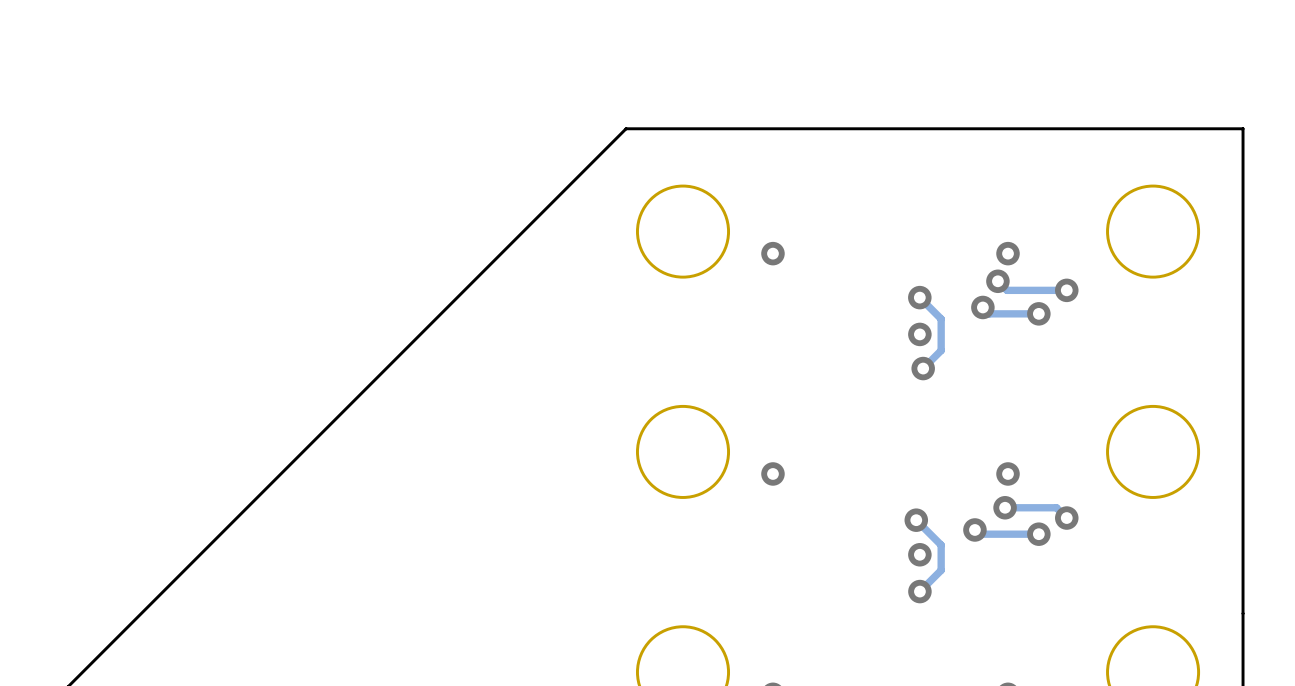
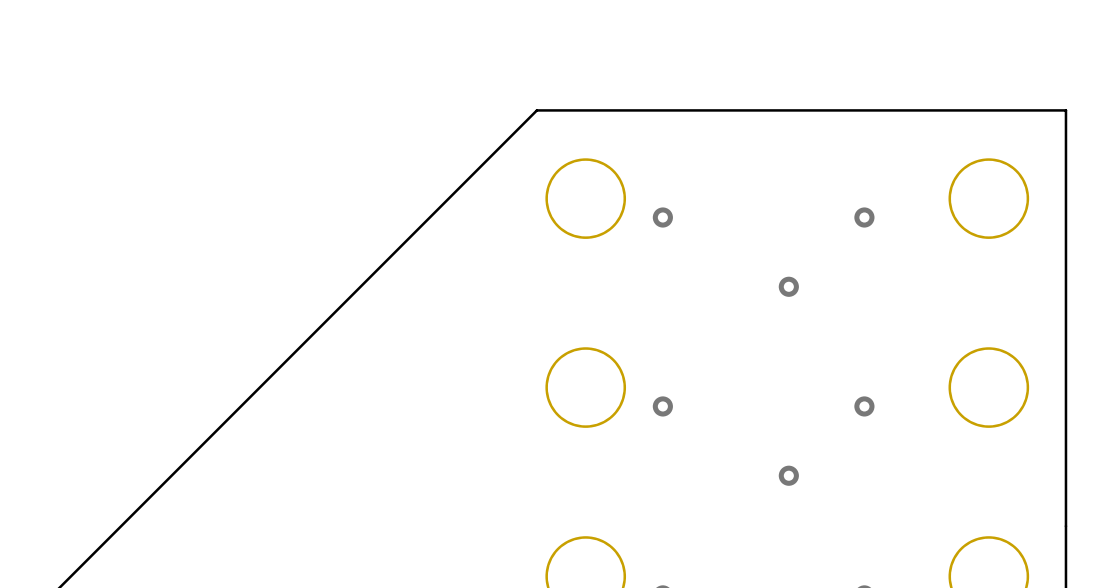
track: (997, 281) (1006, 290) (1066, 290) -> none
via: (997, 281) -> none
via: (1066, 290) -> none
track: (919, 297) (941, 318) (941, 350) (923, 368) -> none
via: (919, 297) -> none
track: (982, 307) (989, 313) (1038, 313) -> none
via: (982, 307) -> none
via: (1038, 313) -> none
via: (923, 368) -> none
track: (1005, 507) (1056, 507) (1066, 518) -> none
via: (1005, 507) -> none
via: (1066, 518) -> none
track: (916, 520) (941, 545) (941, 570) (919, 591) -> none
via: (916, 520) -> none
track: (974, 529) (979, 534) (1038, 534) -> none
via: (974, 529) -> none
via: (1038, 534) -> none
via: (919, 591) -> none

